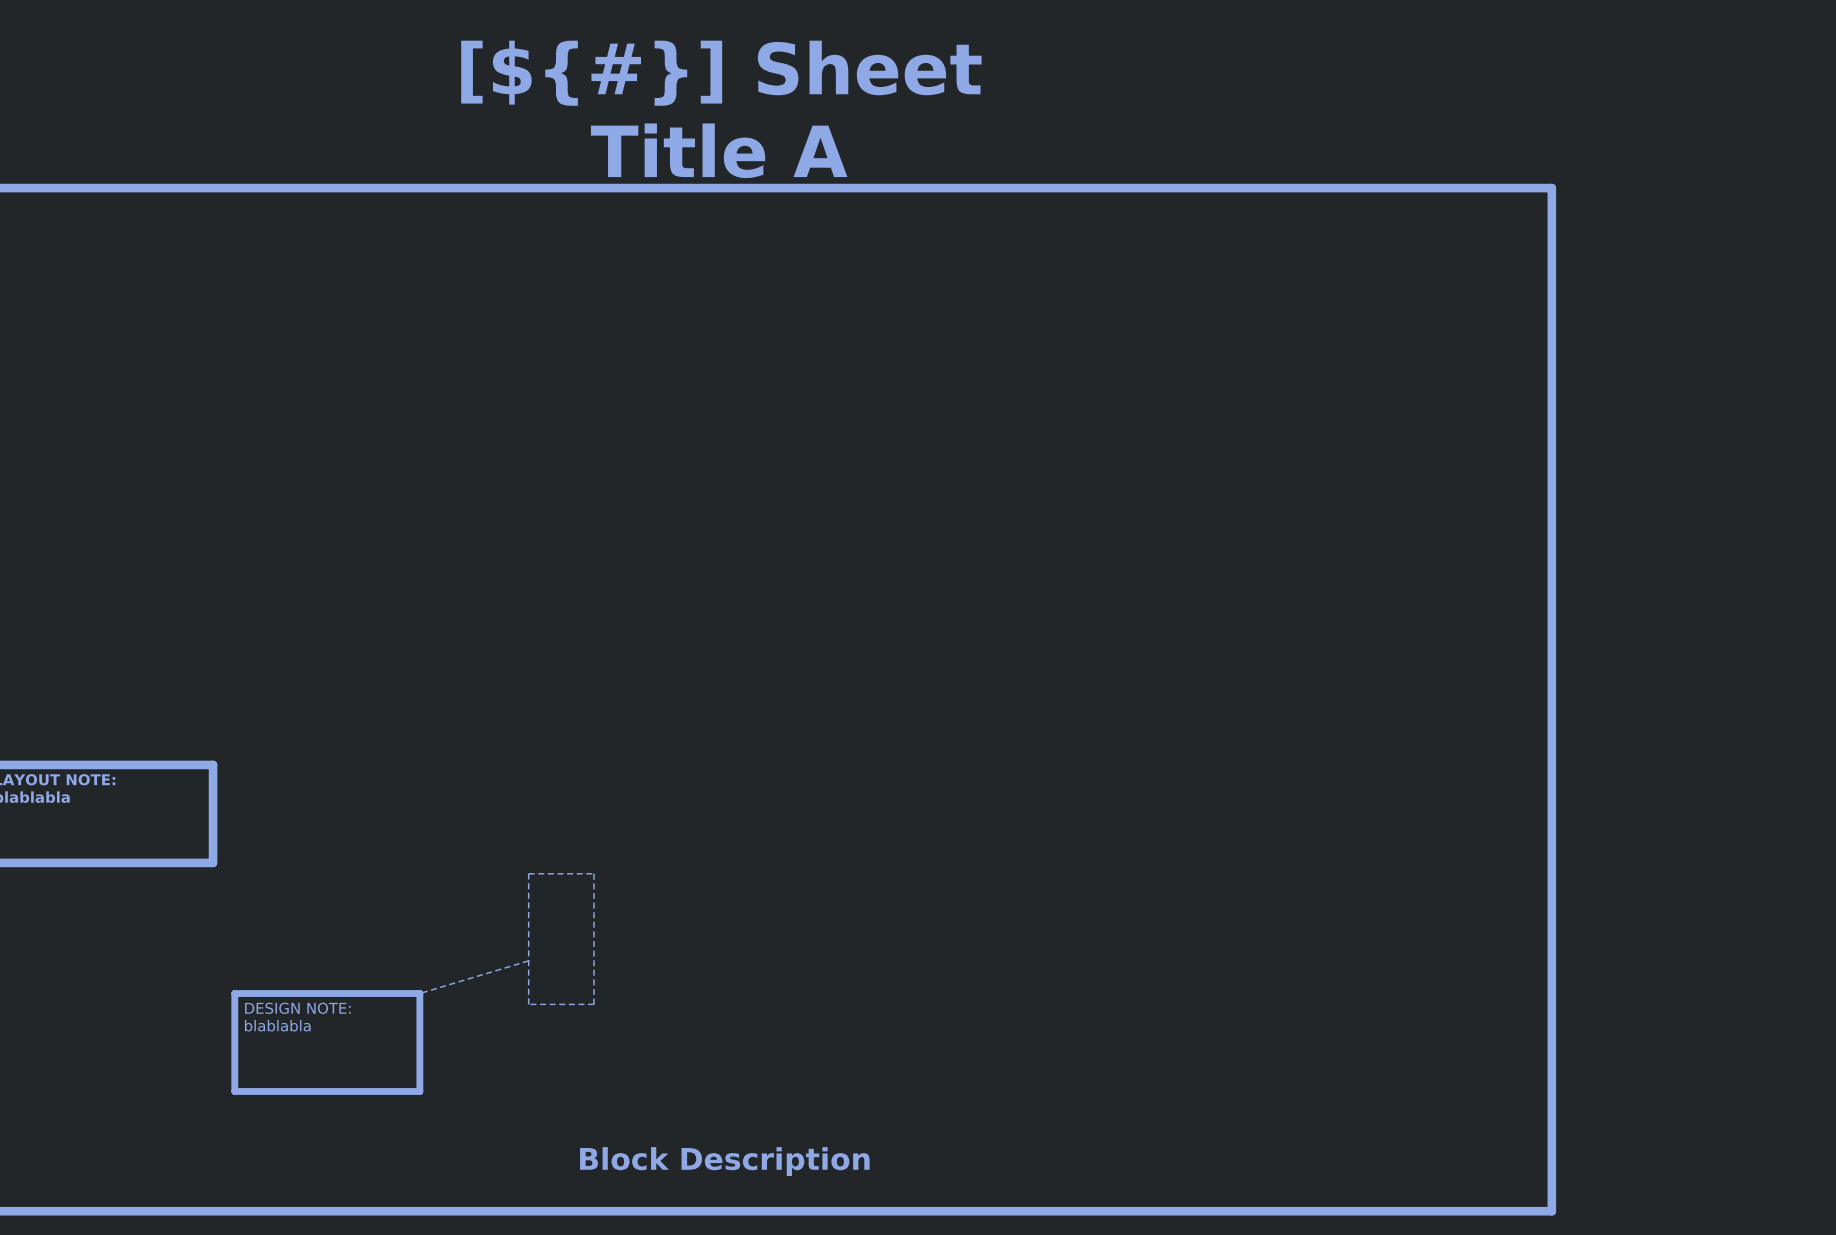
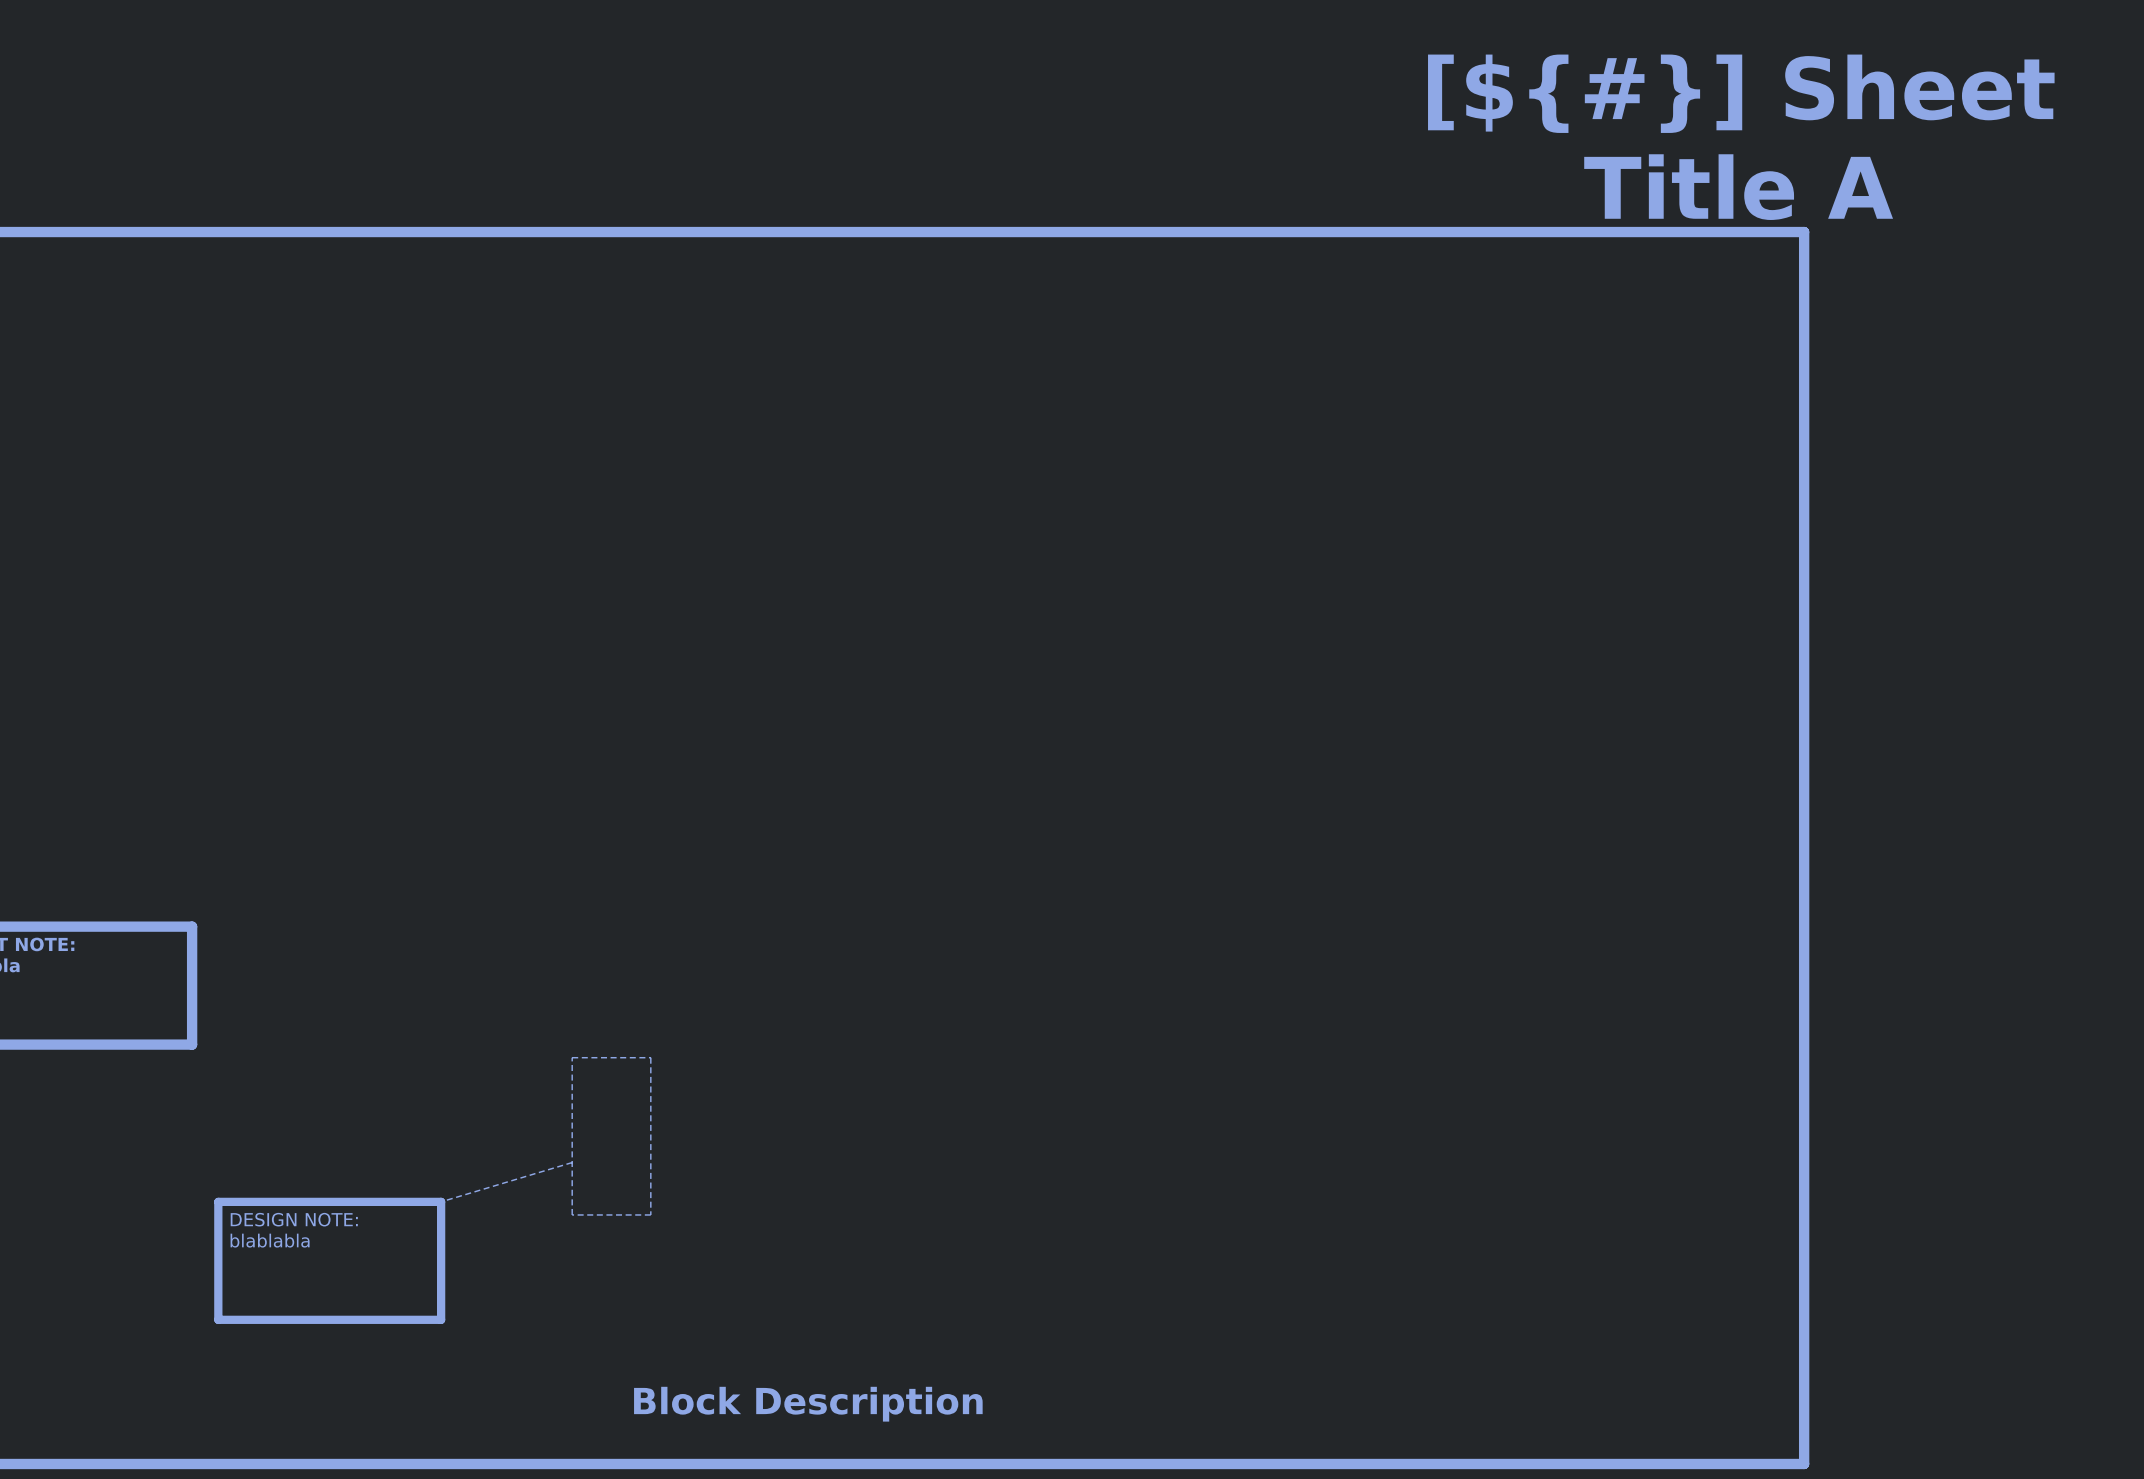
text: [${#}] Sheet (721, 73) -> none
text: none -> [${#}] Sheet (1741, 93)
text: Title A (719, 150) -> none
text: none -> Title A (1738, 187)

